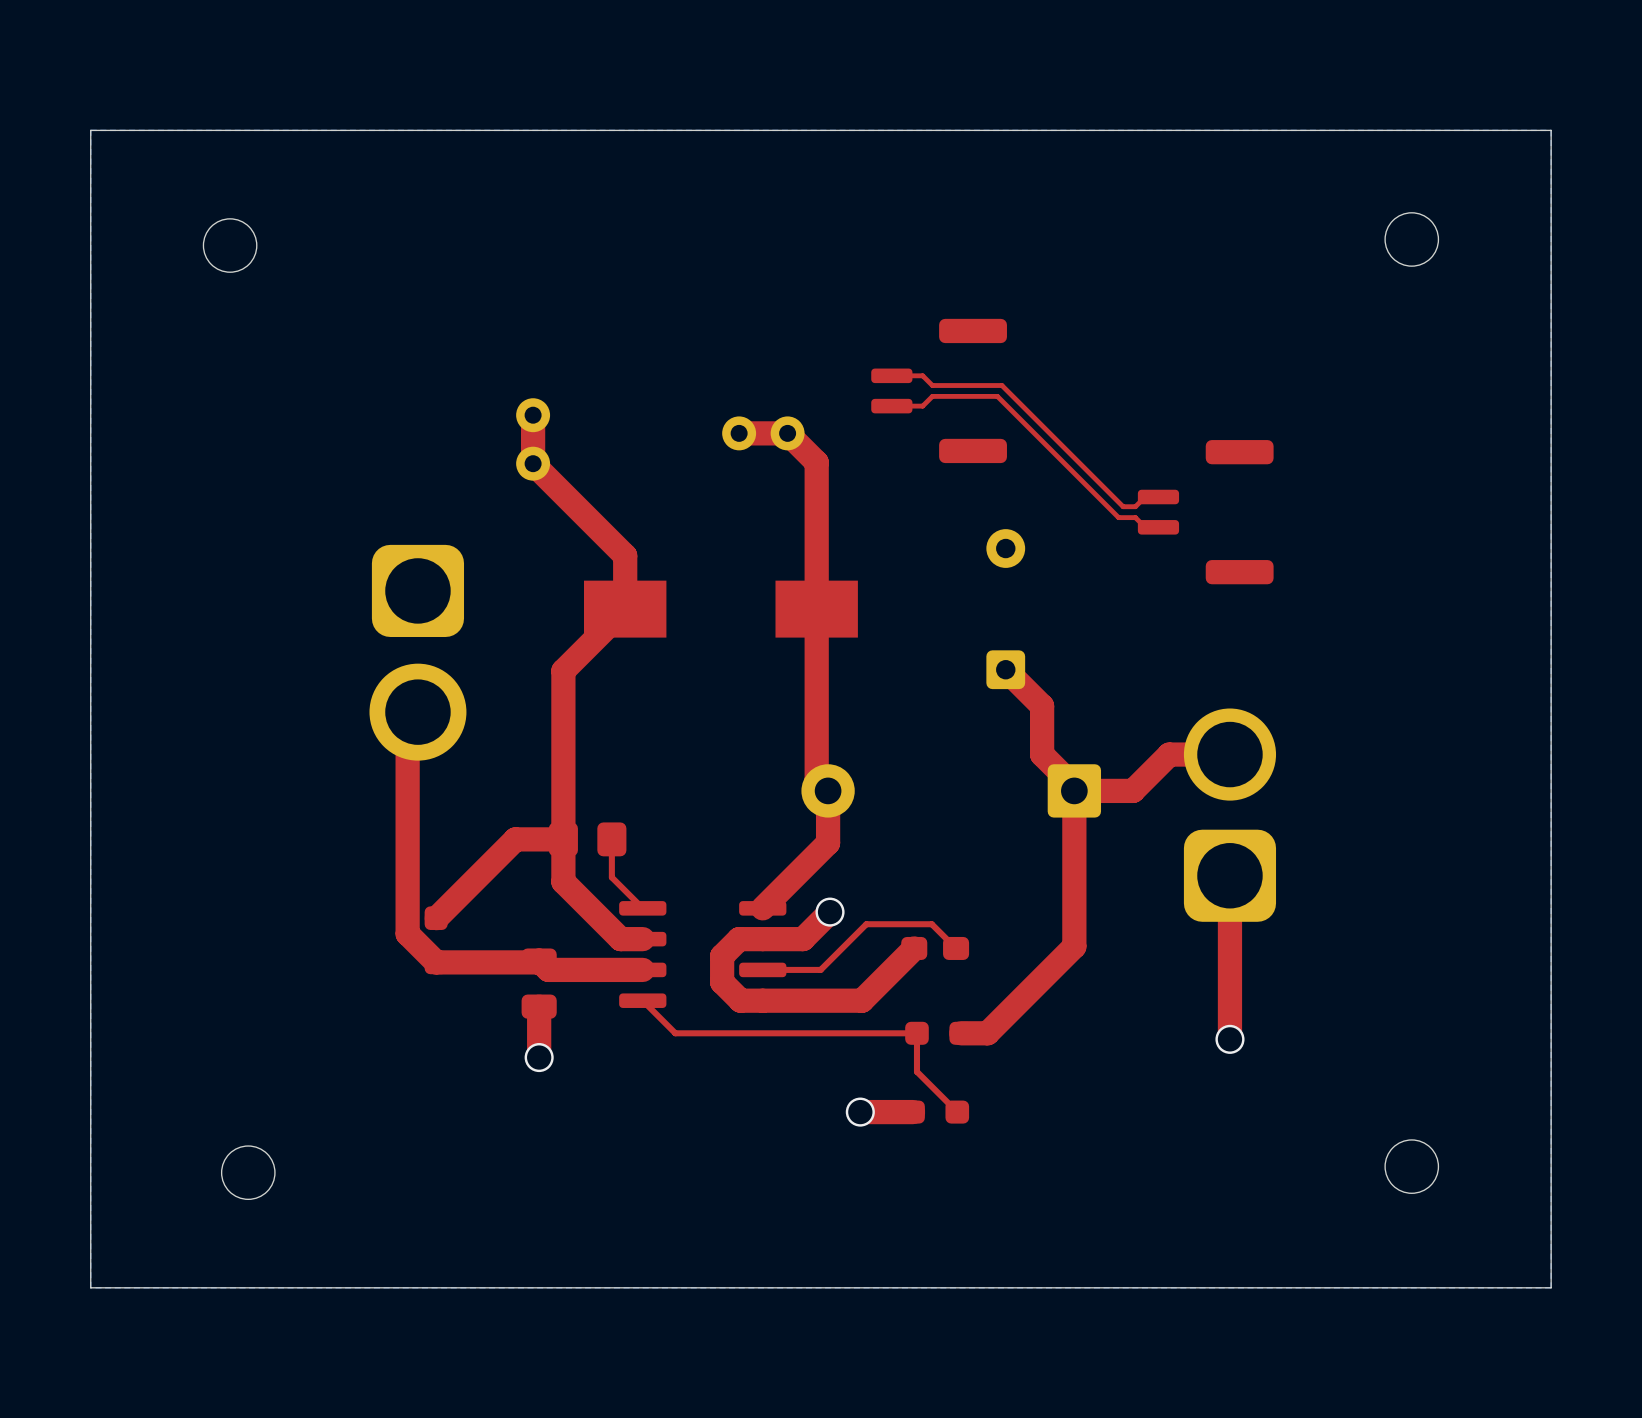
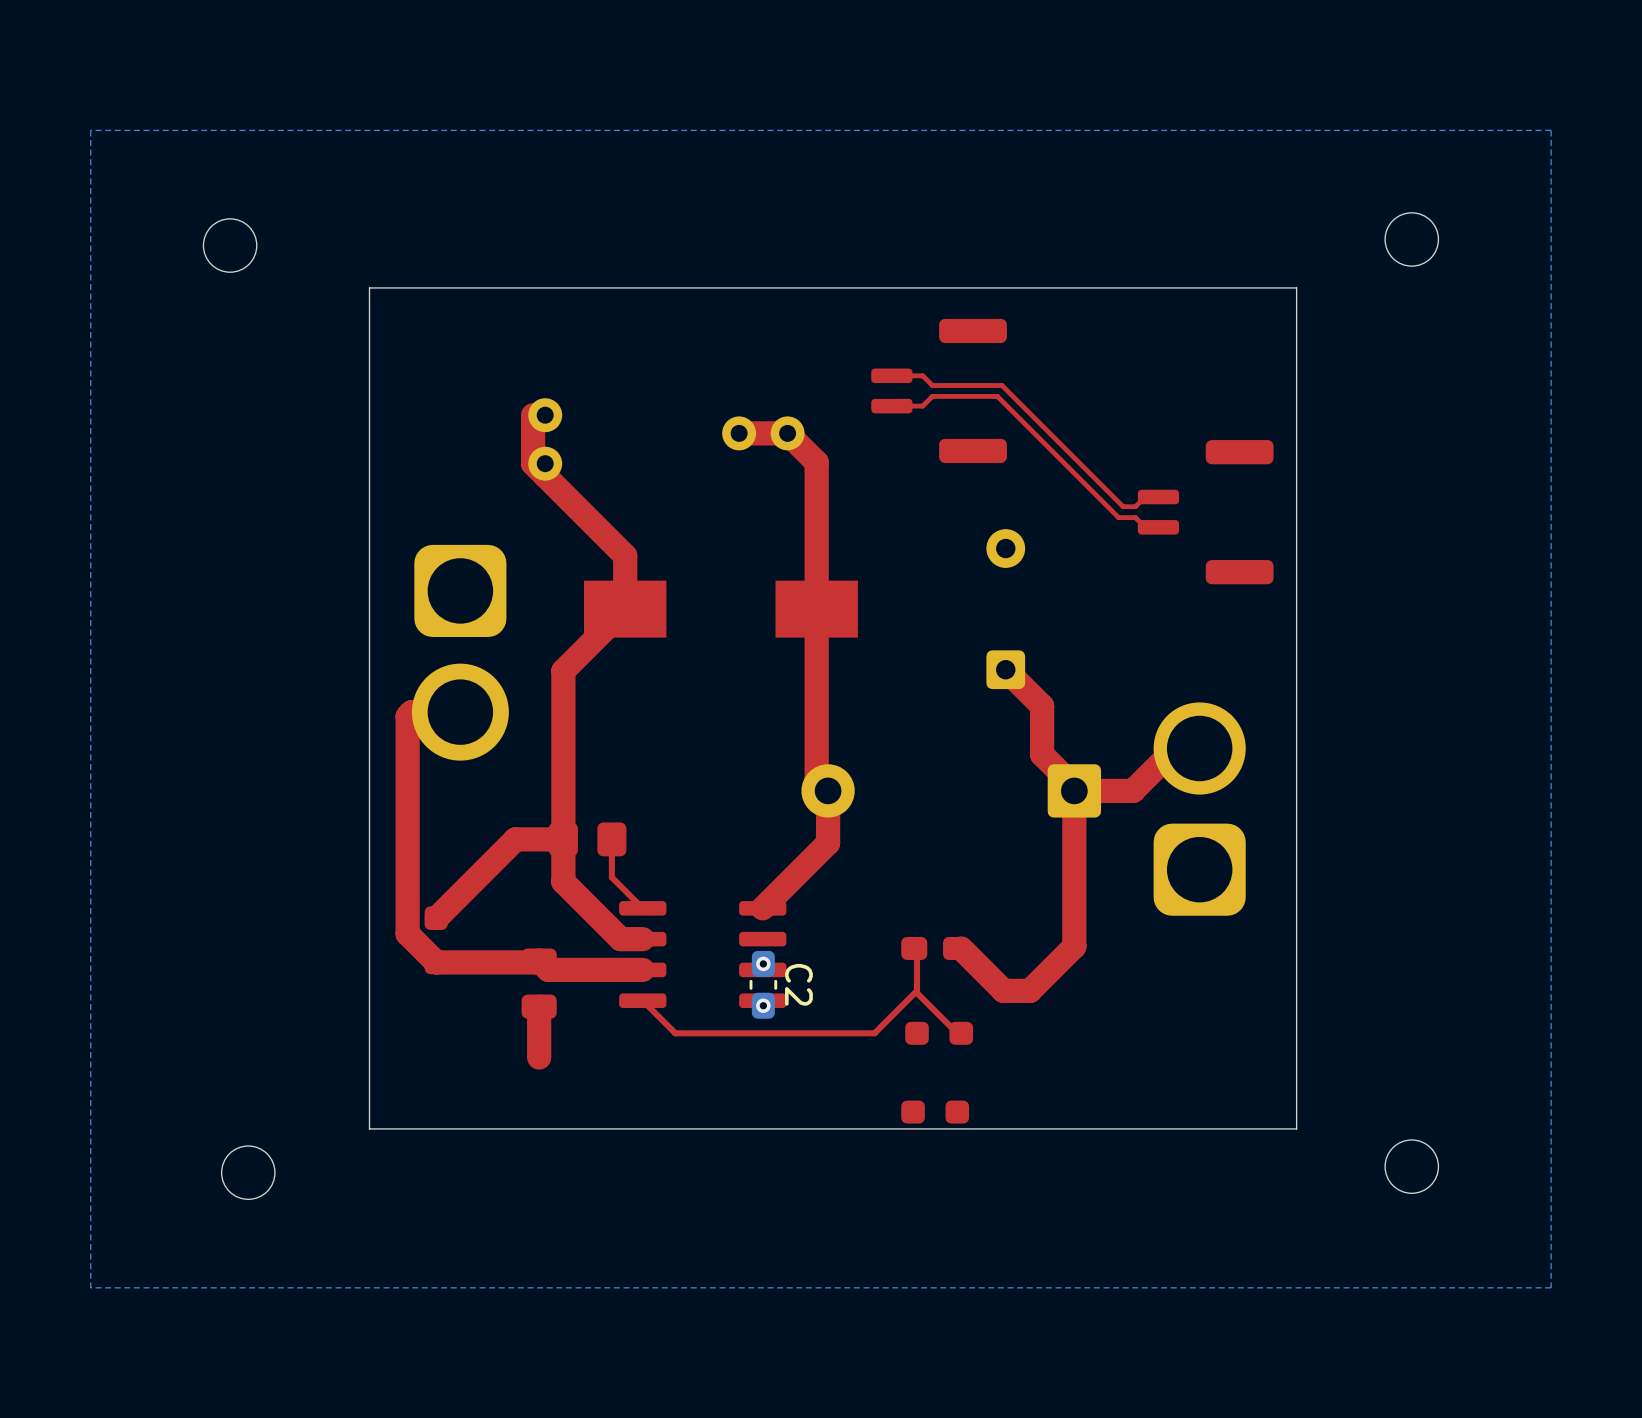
board edge: (1551, 130) (90, 130) (90, 1287) (1551, 1287) (1551, 130) -> none
board edge: none -> (1296, 287) (369, 287) (369, 1128) (1296, 1128) (1296, 287)
part position: (533, 439) -> (545, 439)
part position: (417, 652) -> (460, 652)
part position: (1229, 815) -> (1199, 809)
top track: (1229, 875) (1229, 1039) -> none
top track: (830, 912) (803, 939) (739, 939) (722, 956) (722, 982) (740, 1000) (862, 1000) (914, 948) -> none
via: (830, 912) -> none
top track: none -> (916, 948) (916, 993) (957, 1033)
top track: (956, 948) (931, 924) (866, 924) (820, 969) (762, 969) -> none
via: none -> (763, 963)
C2: none -> (763, 984)
top track: (1030, 990) (987, 1033) (961, 1033) -> (1030, 990) (1003, 990) (961, 948)
via: none -> (763, 1005)
top track: (874, 1033) (916, 1033) (916, 1071) (957, 1112) -> (874, 1033) (916, 990)
via: (1229, 1039) -> none
via: (539, 1057) -> none
via: (860, 1112) -> none
top track: (913, 1112) (860, 1112) -> none

